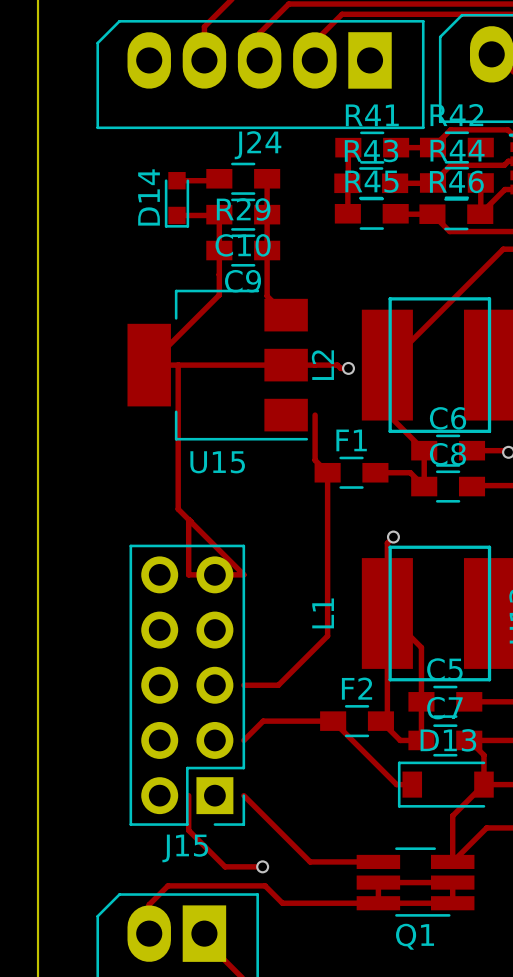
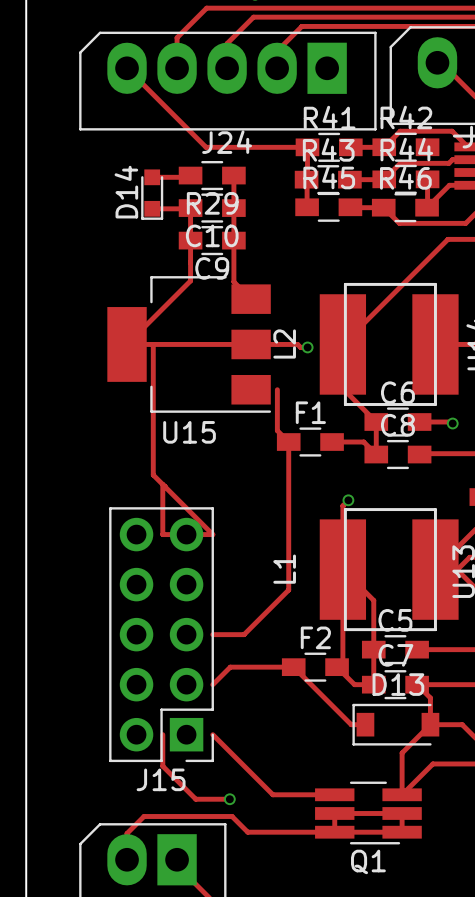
track: none -> (127, 68) (206, 147) (307, 147)

